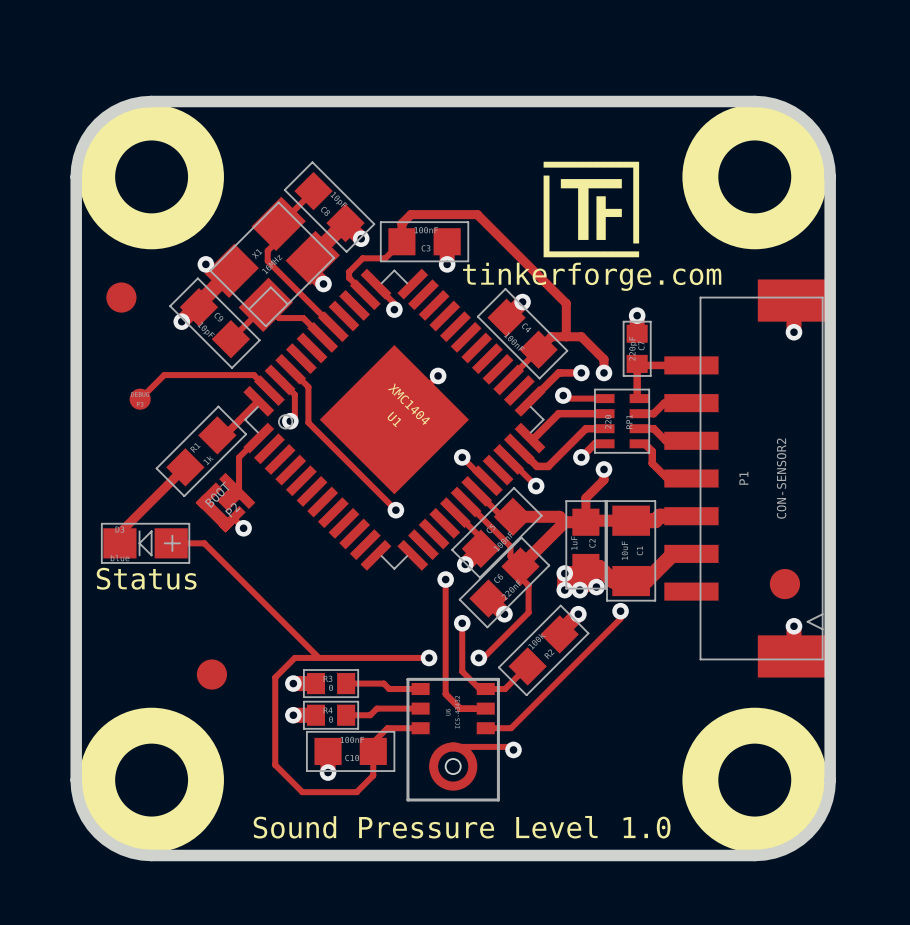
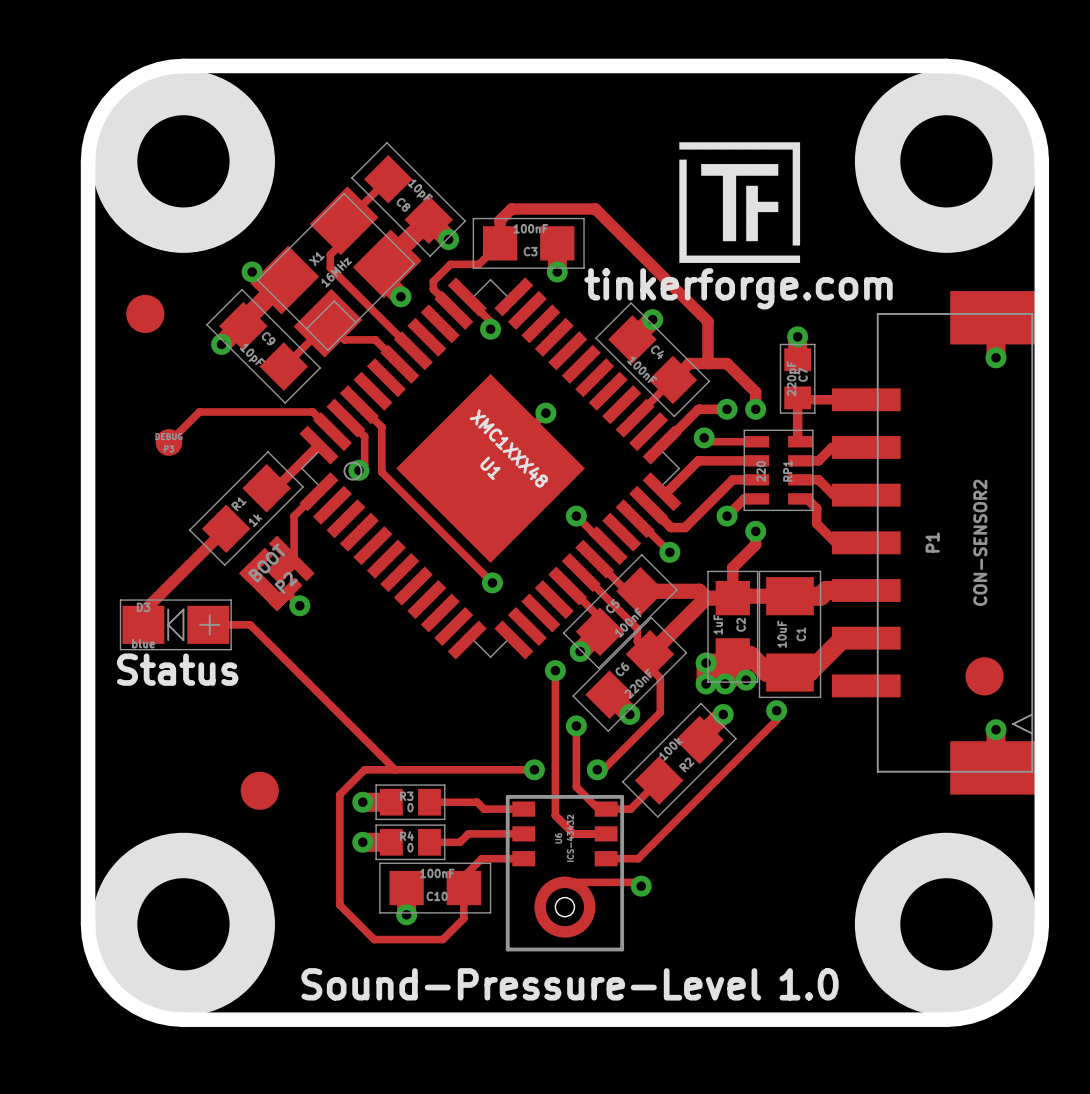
U1 value: XMC1404 (408, 404) -> XMC1XXX48 (508, 448)
text: Sound Pressure Level (425, 827) -> Sound-Pressure-Level (531, 984)

